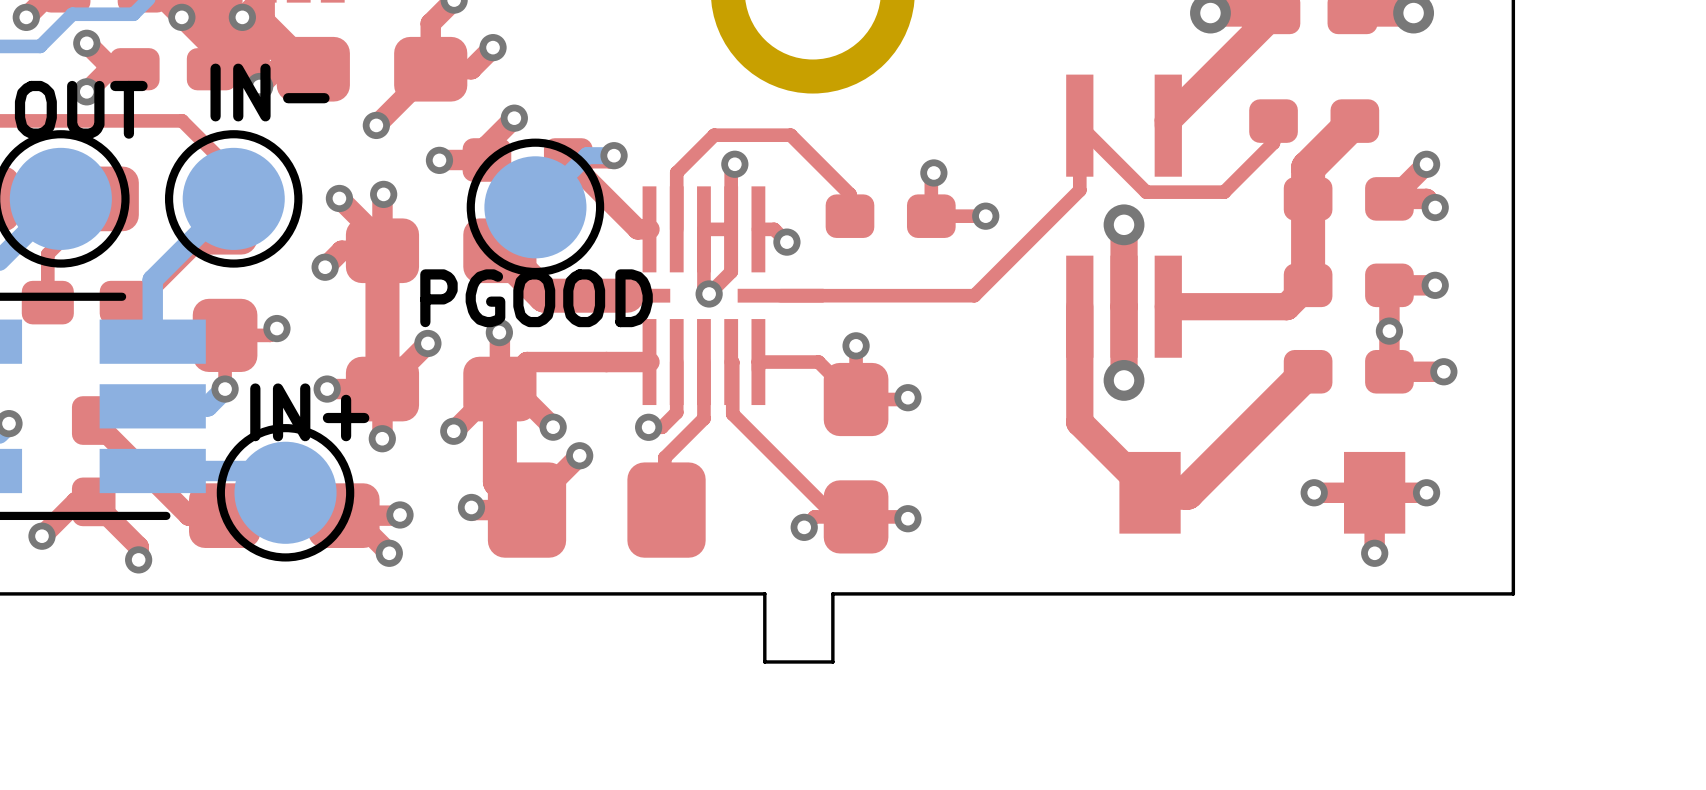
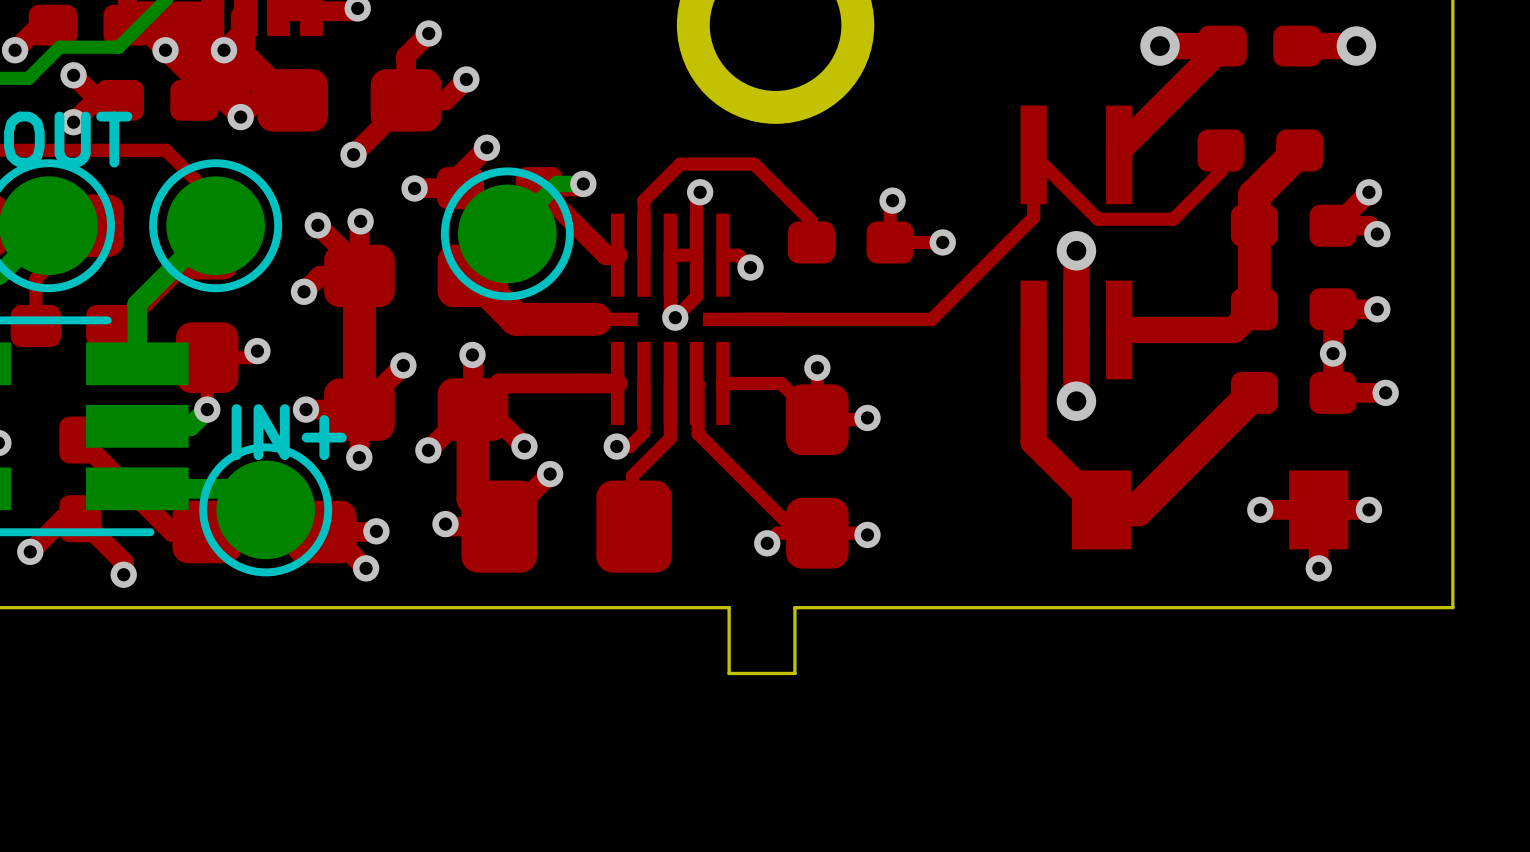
part value: IN- (270, 92) -> none
part value: PGOOD (536, 298) -> none

